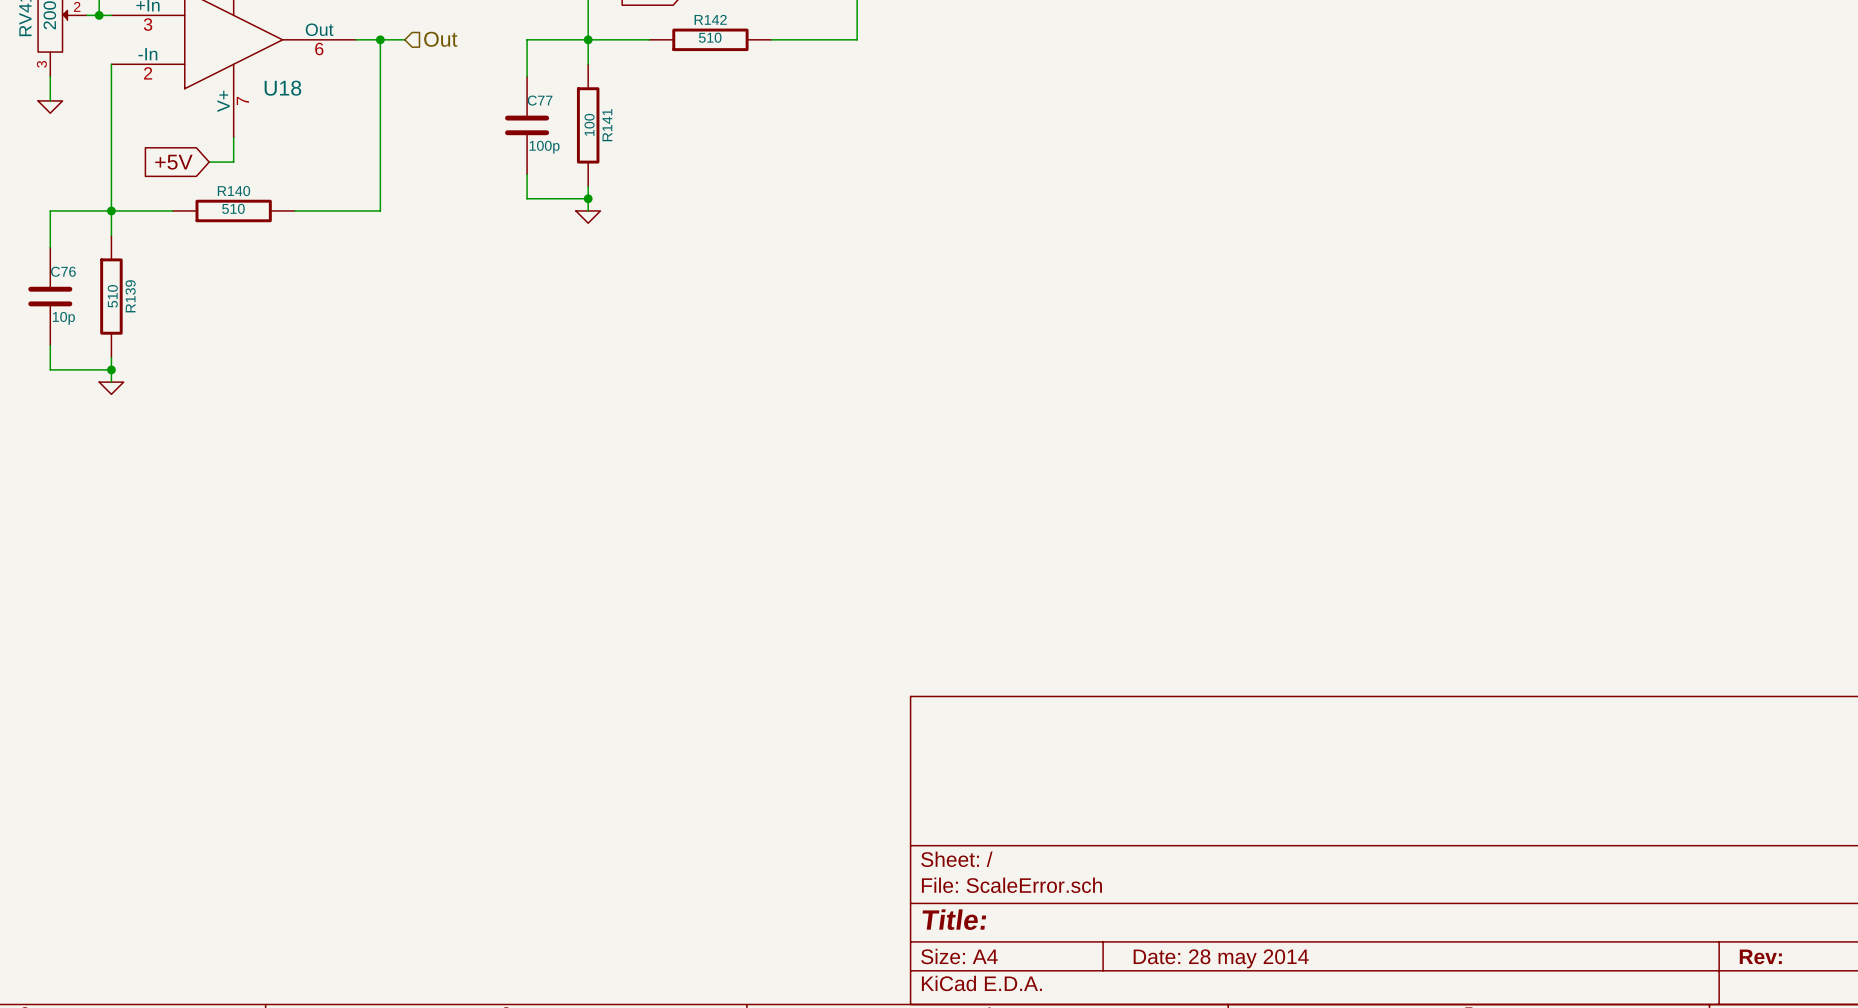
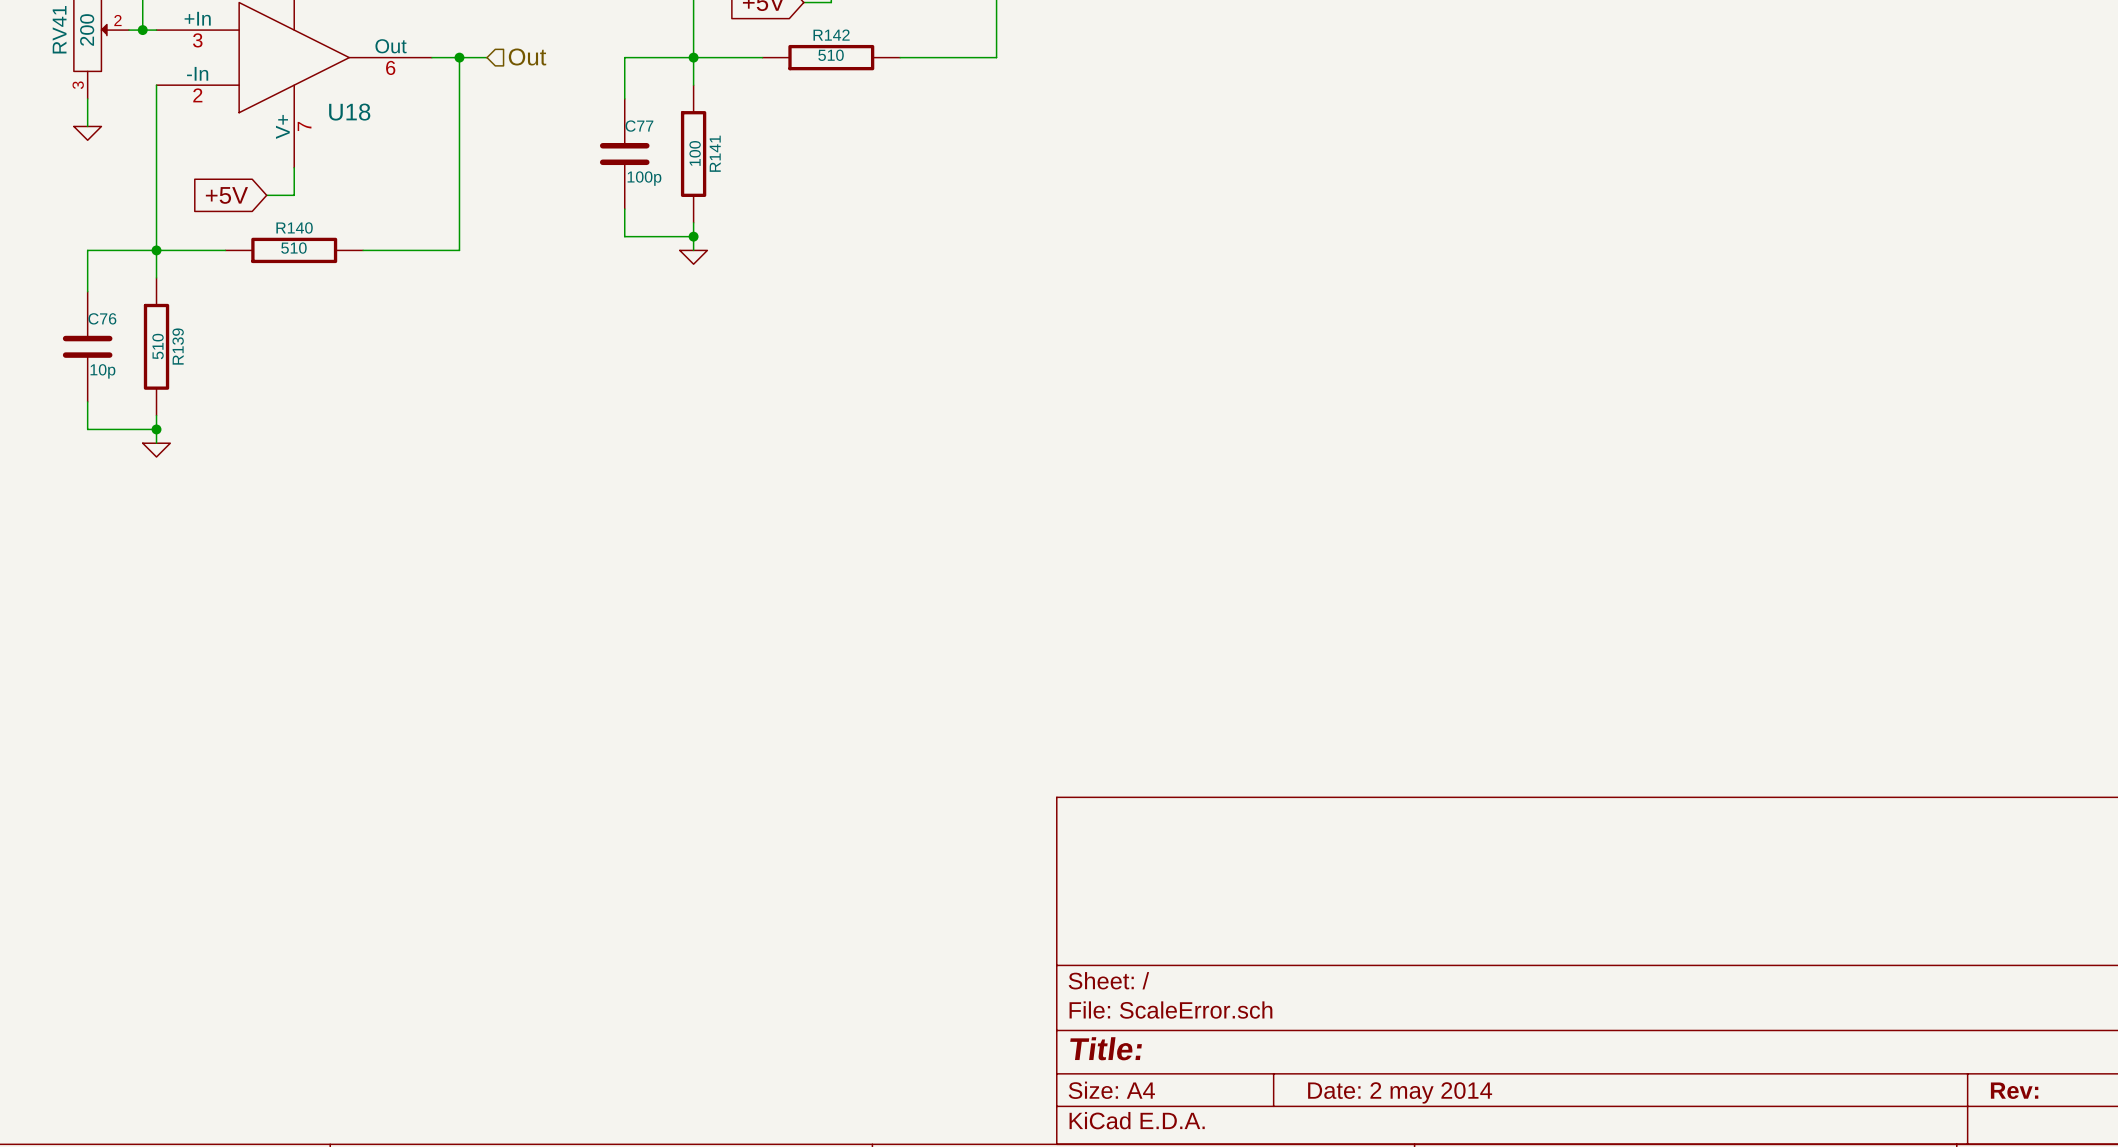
title block: Date: 28 may 2014 (1221, 958) -> Date: 2 may 2014 (1400, 1092)

